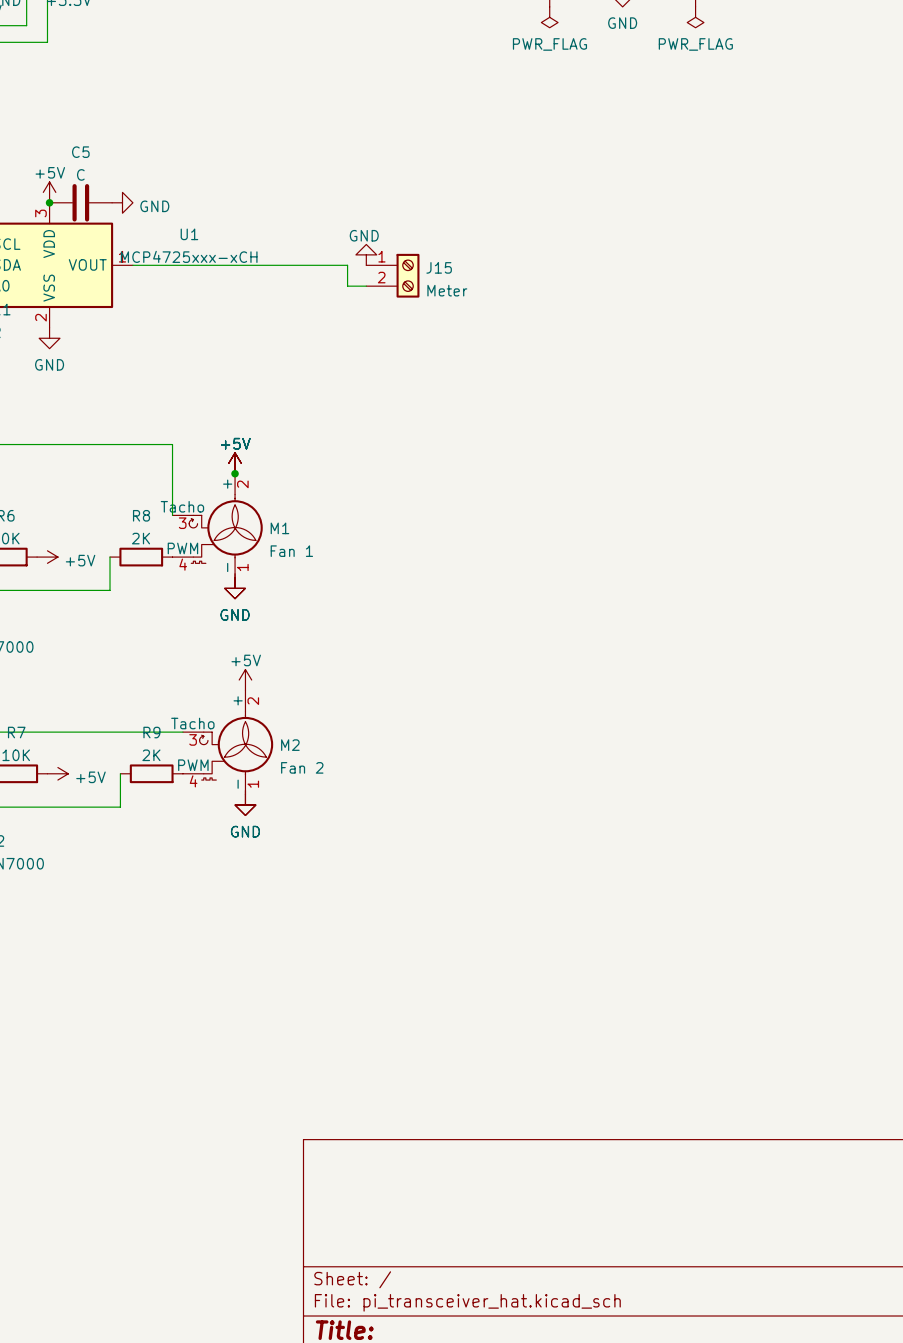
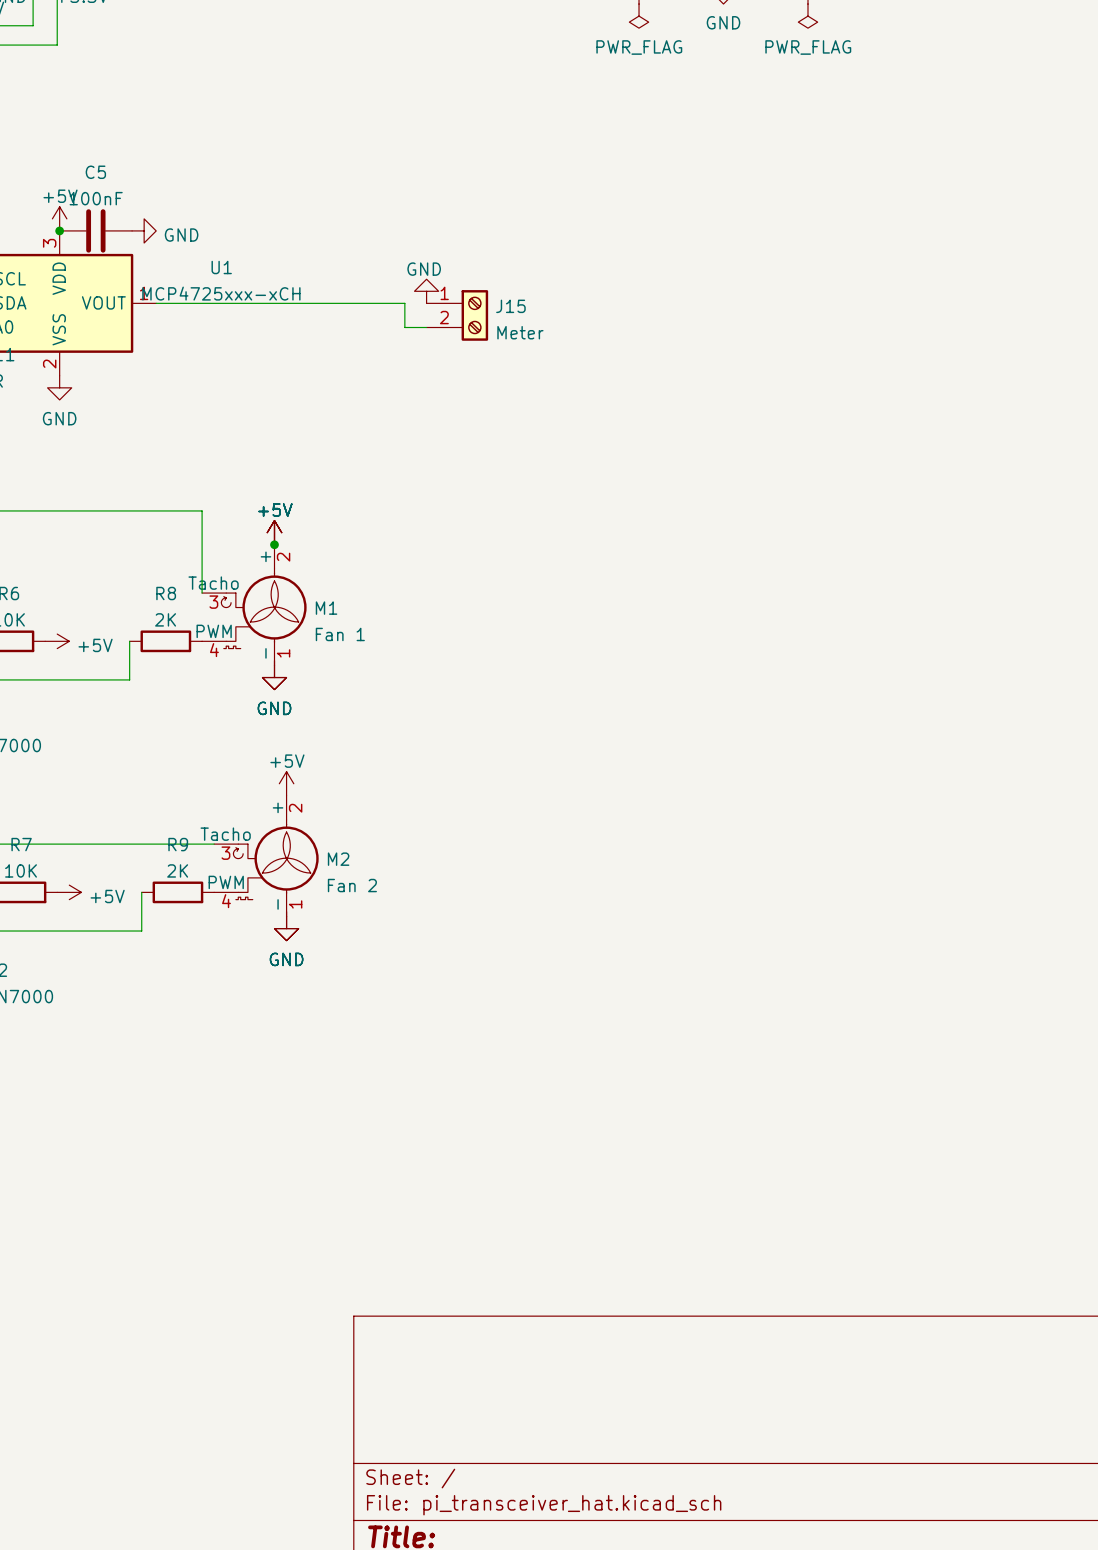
C5 value: C (80, 174) -> 100nF (96, 198)

